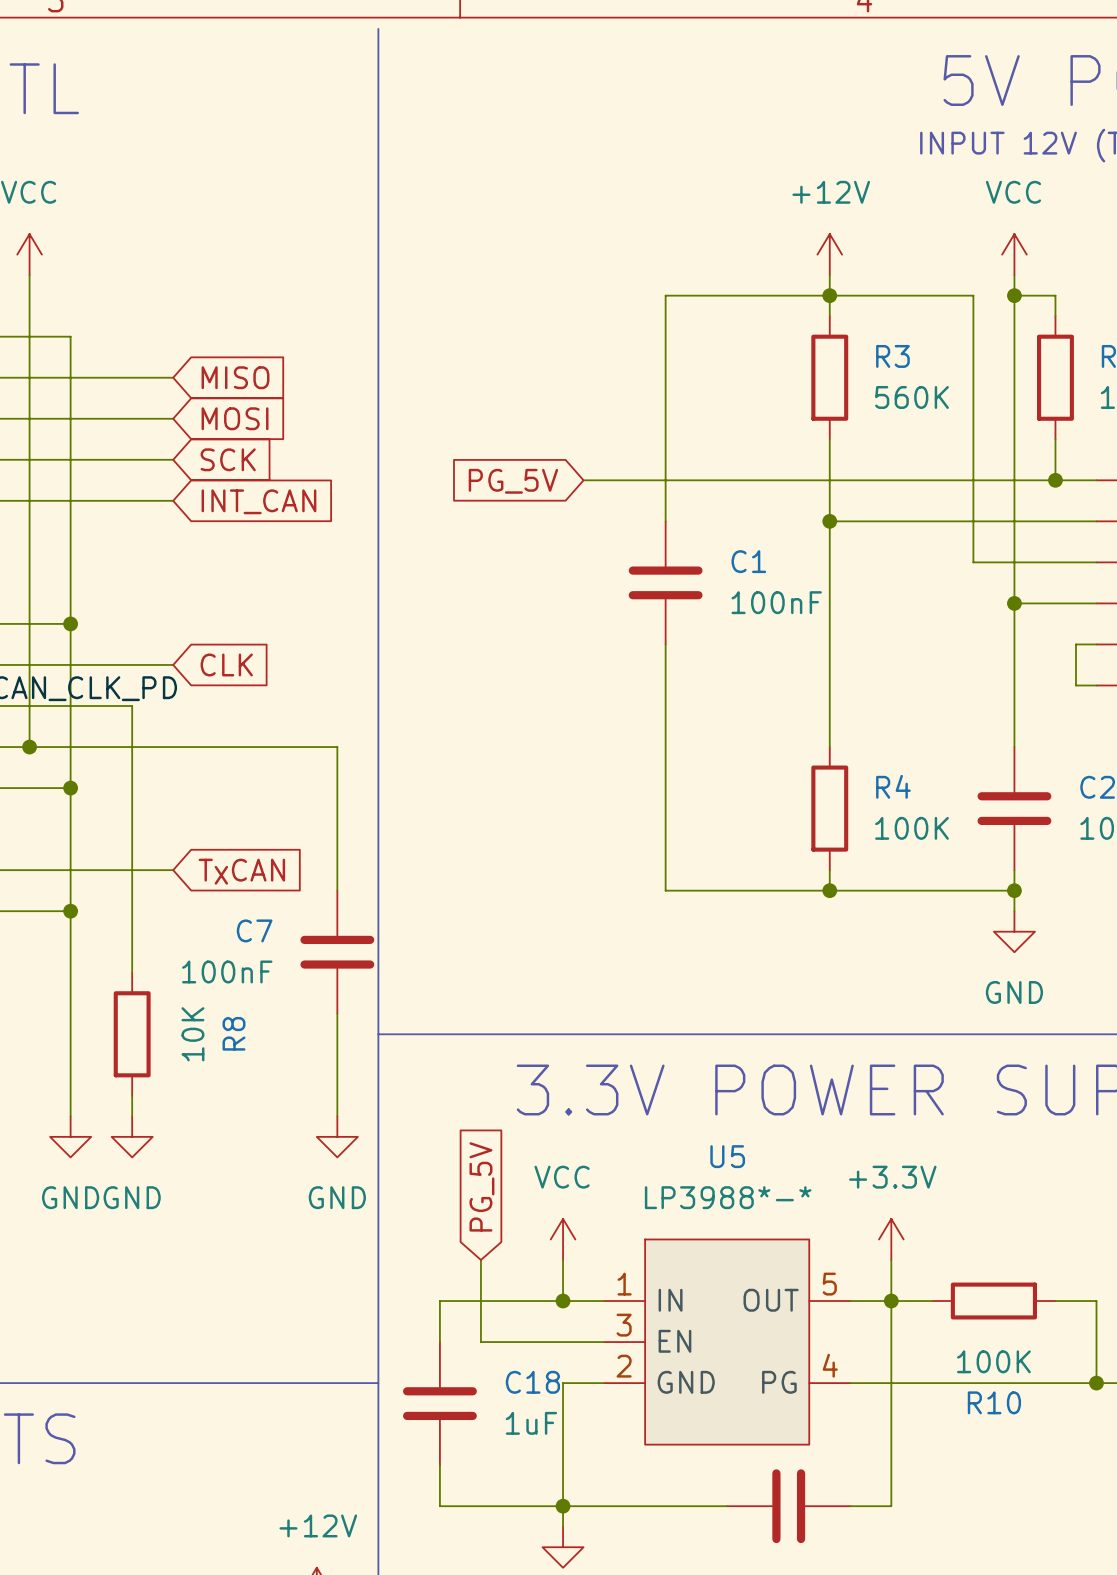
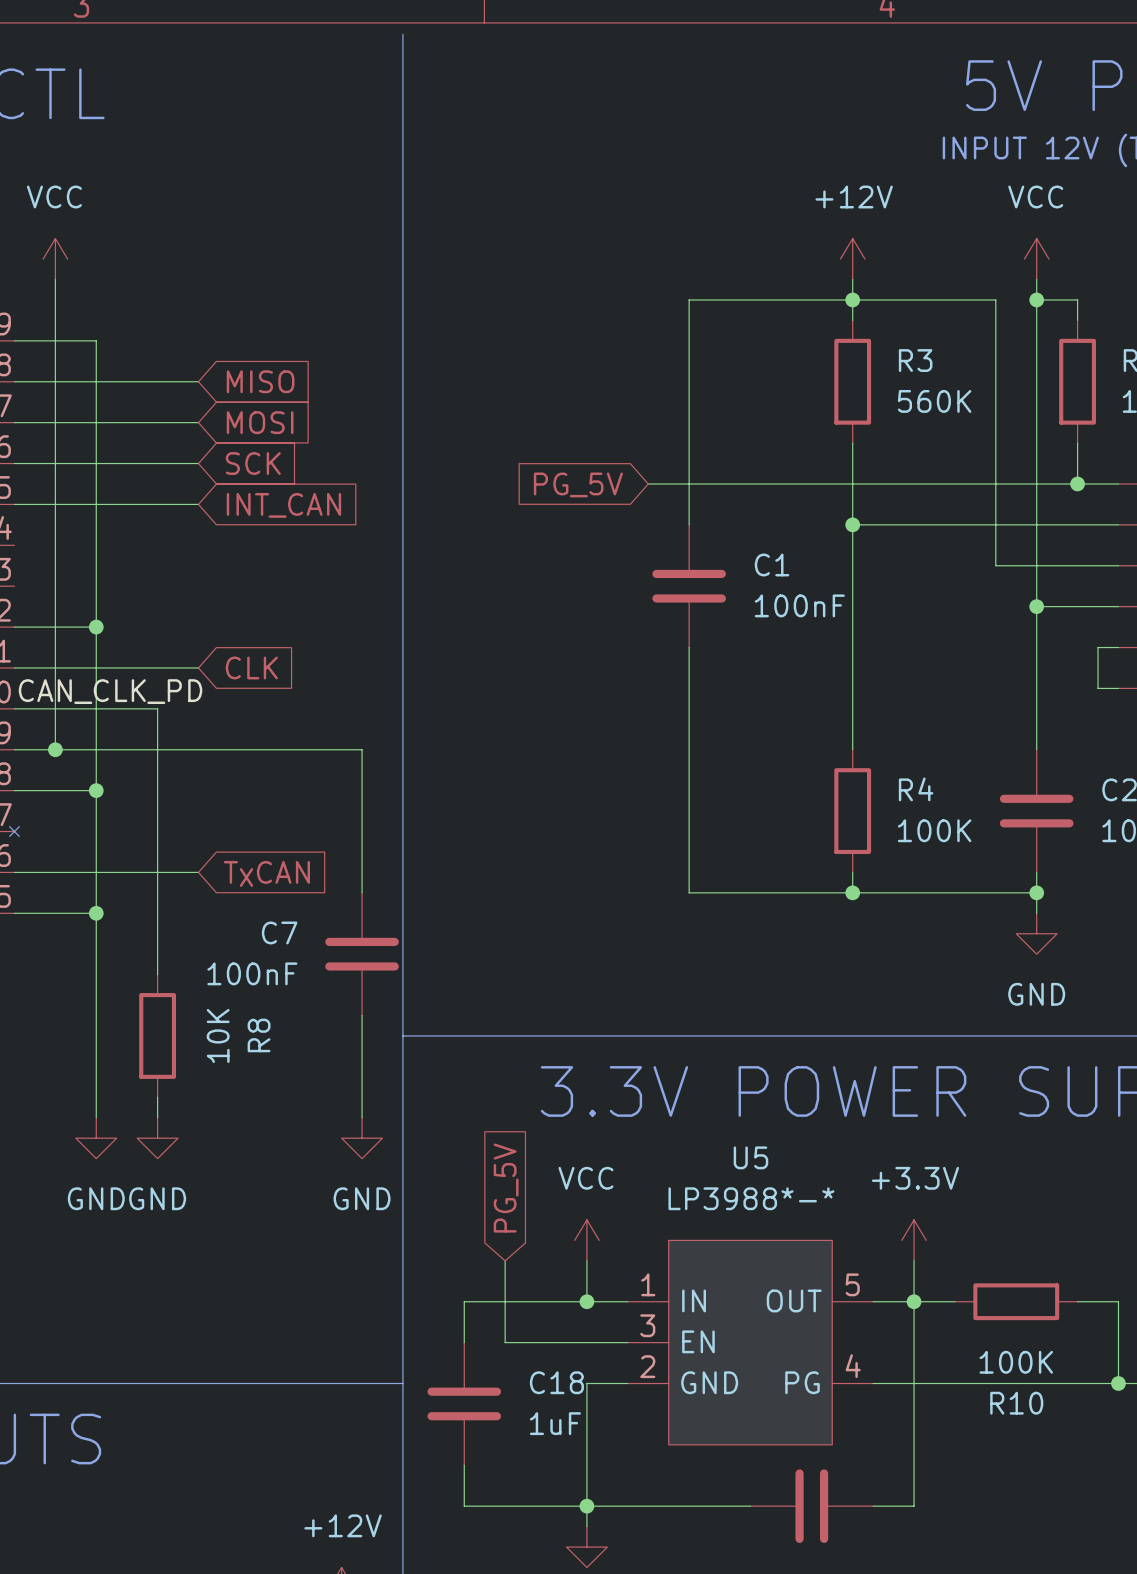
wire: (583, 480) (624, 480) -> none
global label position: PG_5V (513, 481) -> PG_5V (578, 484)

